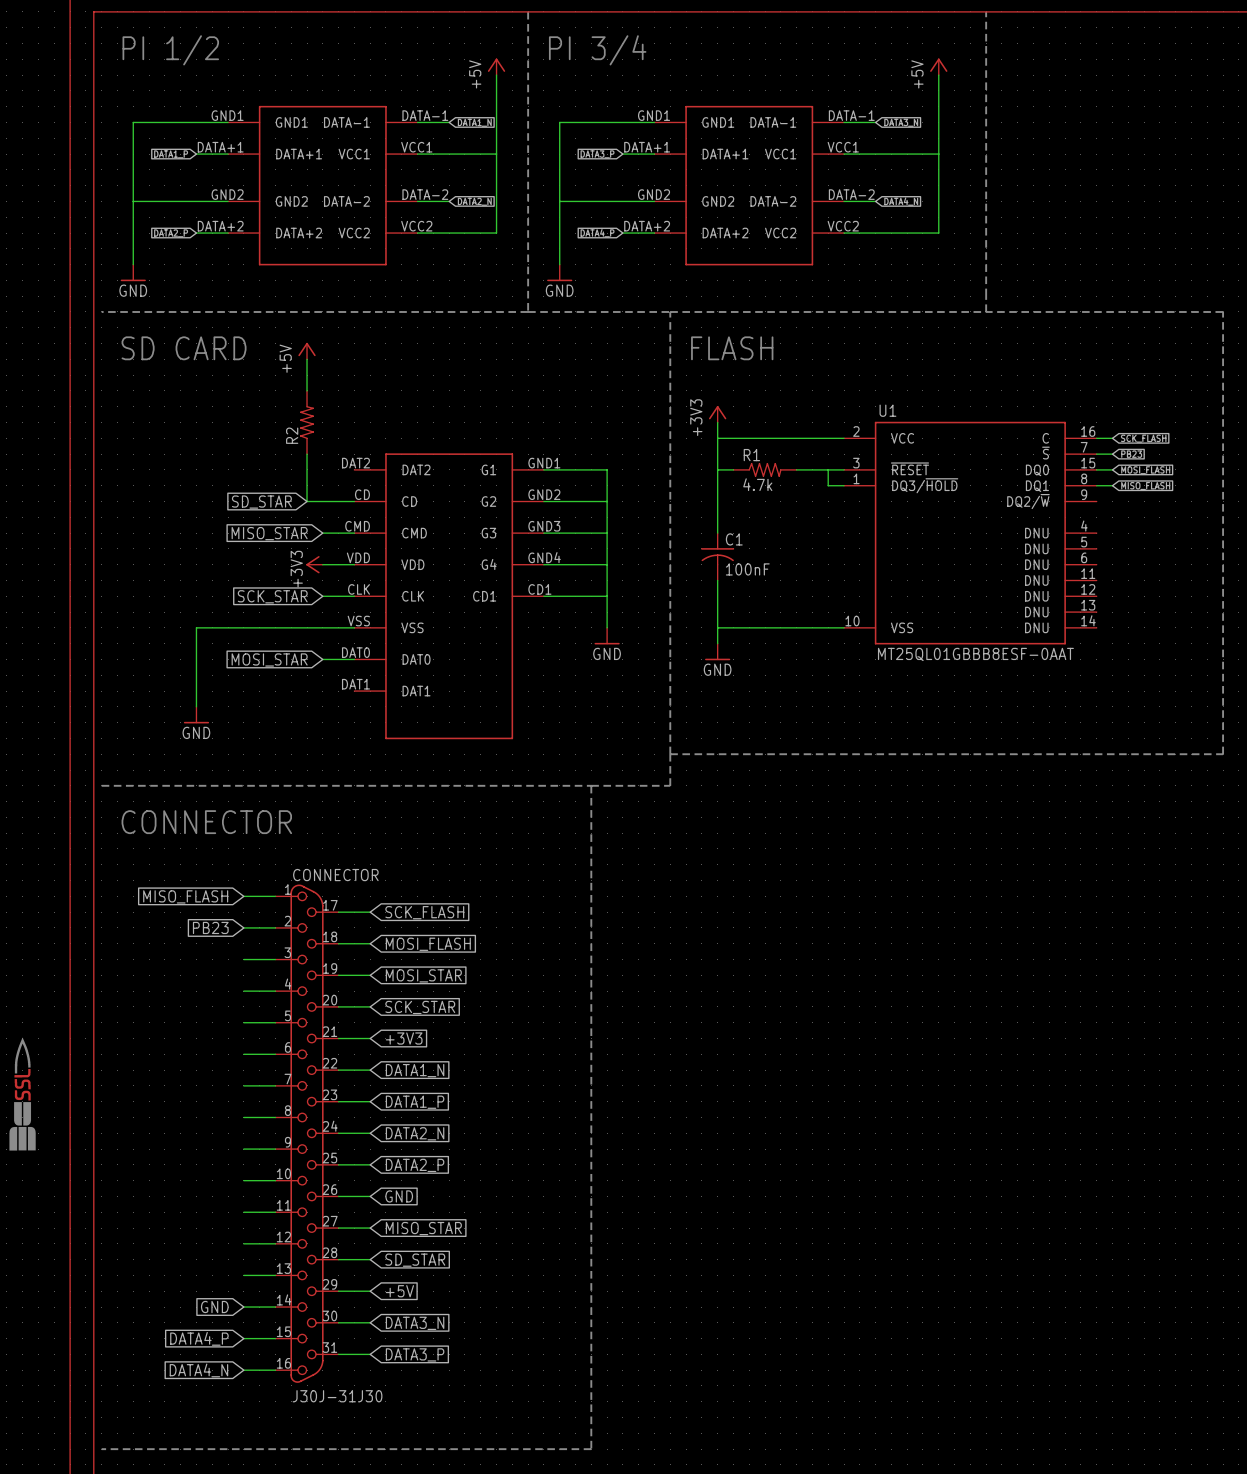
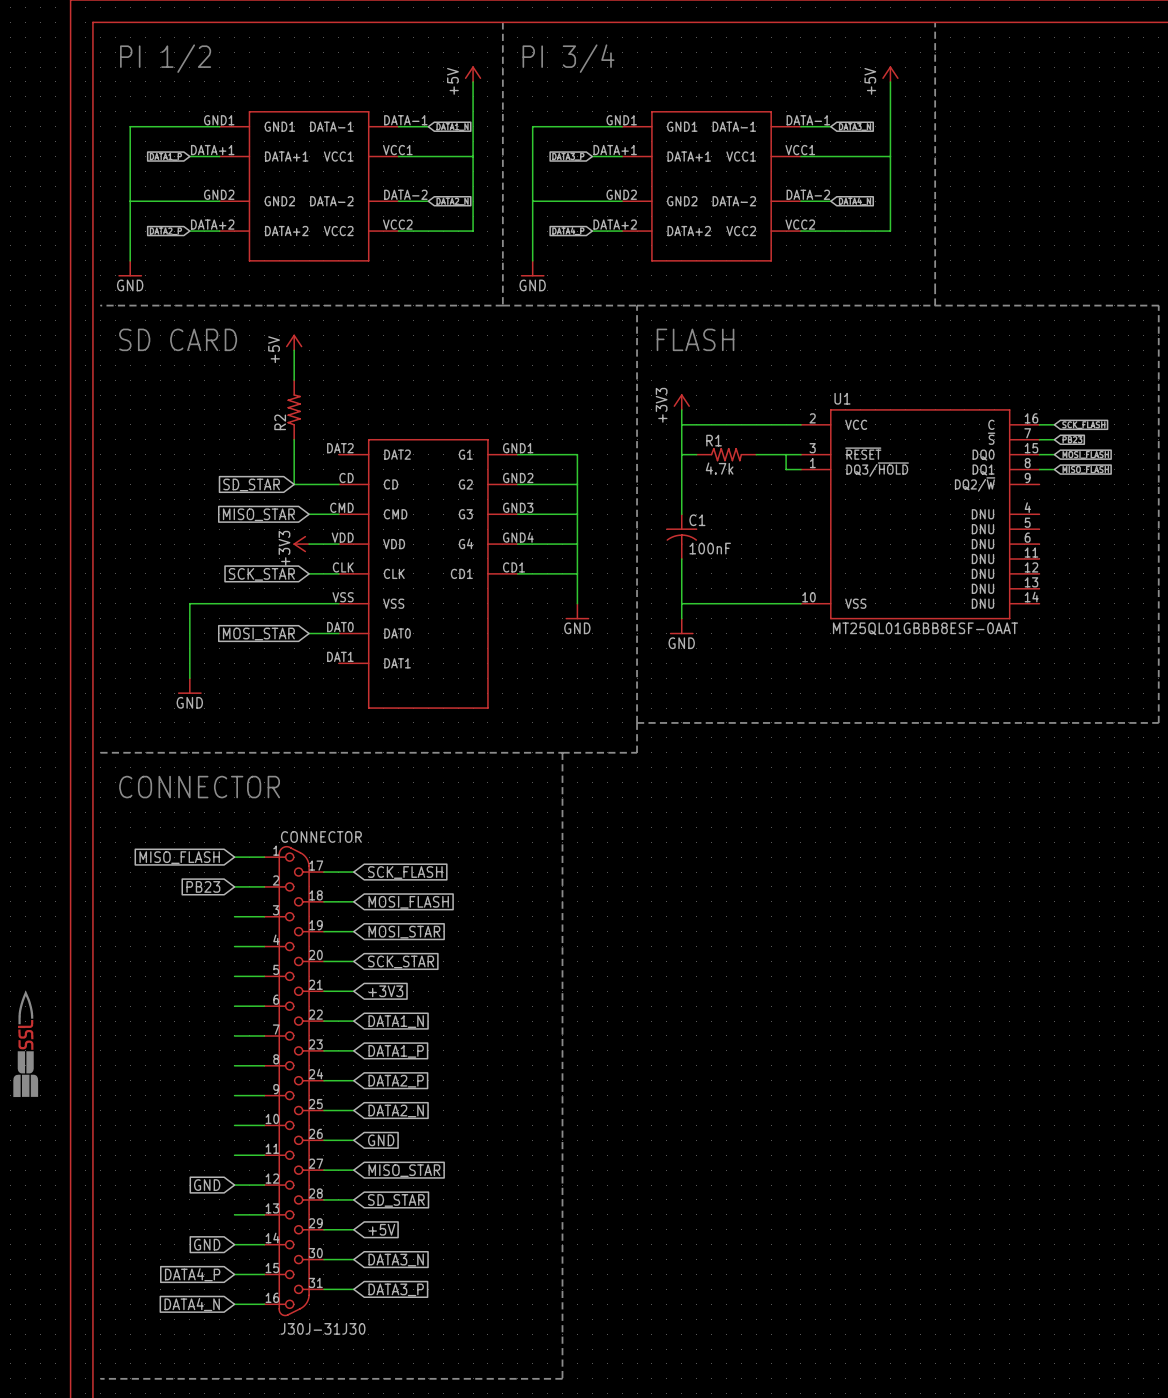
global label: DATA2_N (415, 1133) -> DATA2_P (396, 1081)
global label: DATA2_P (415, 1165) -> DATA2_N (396, 1111)
global label: none -> GND (207, 1185)

